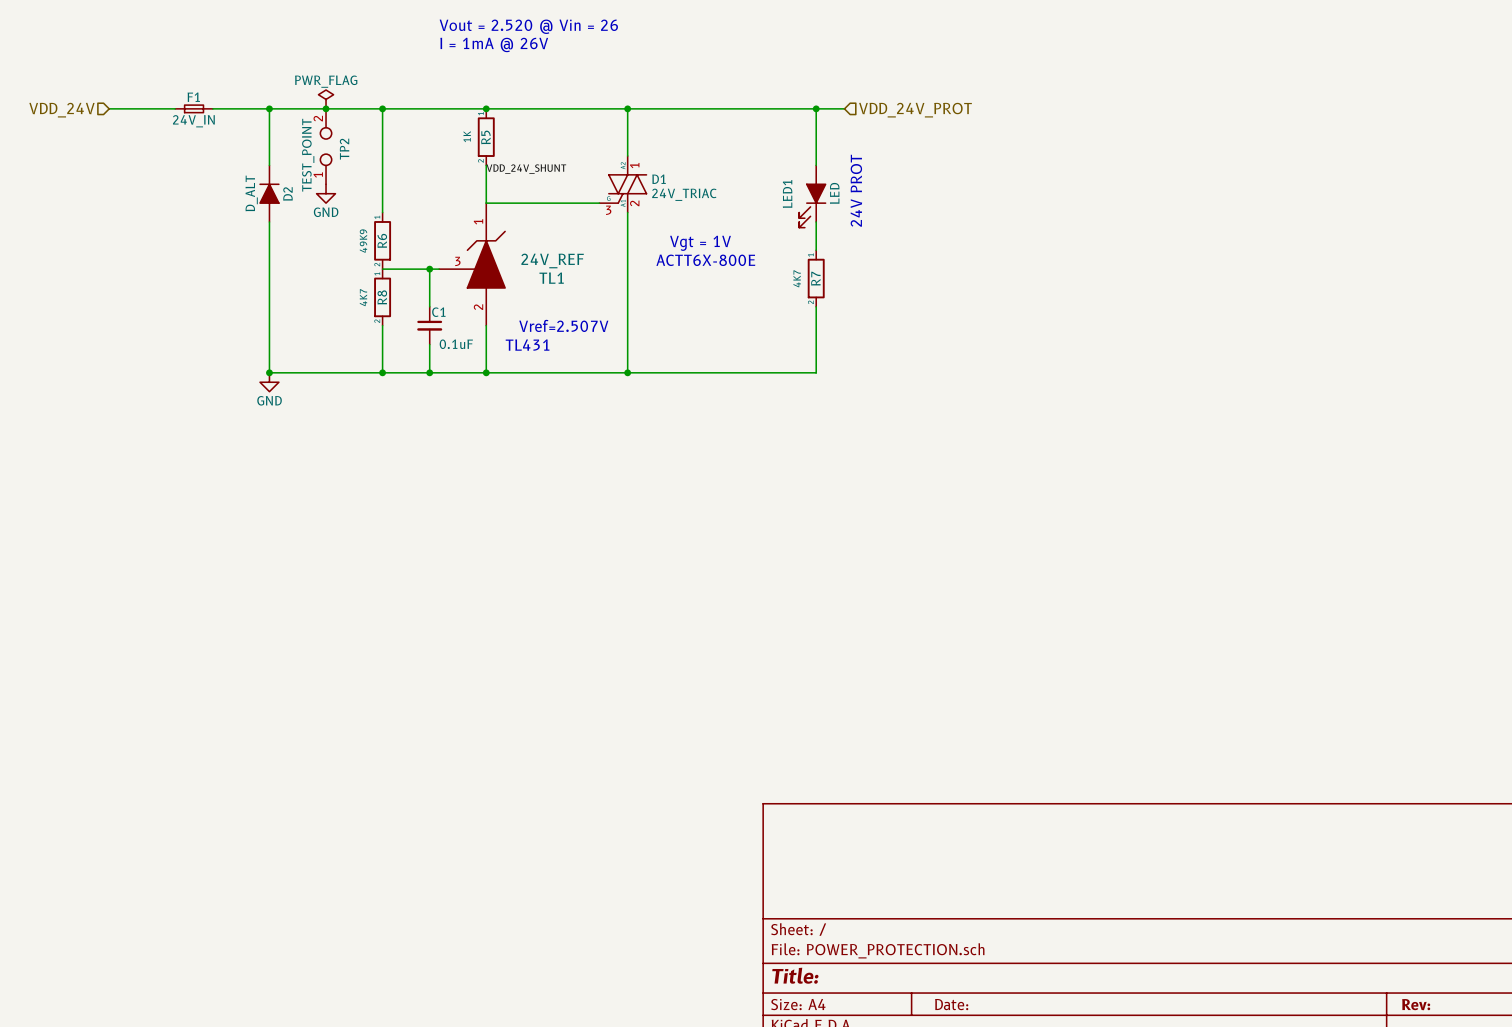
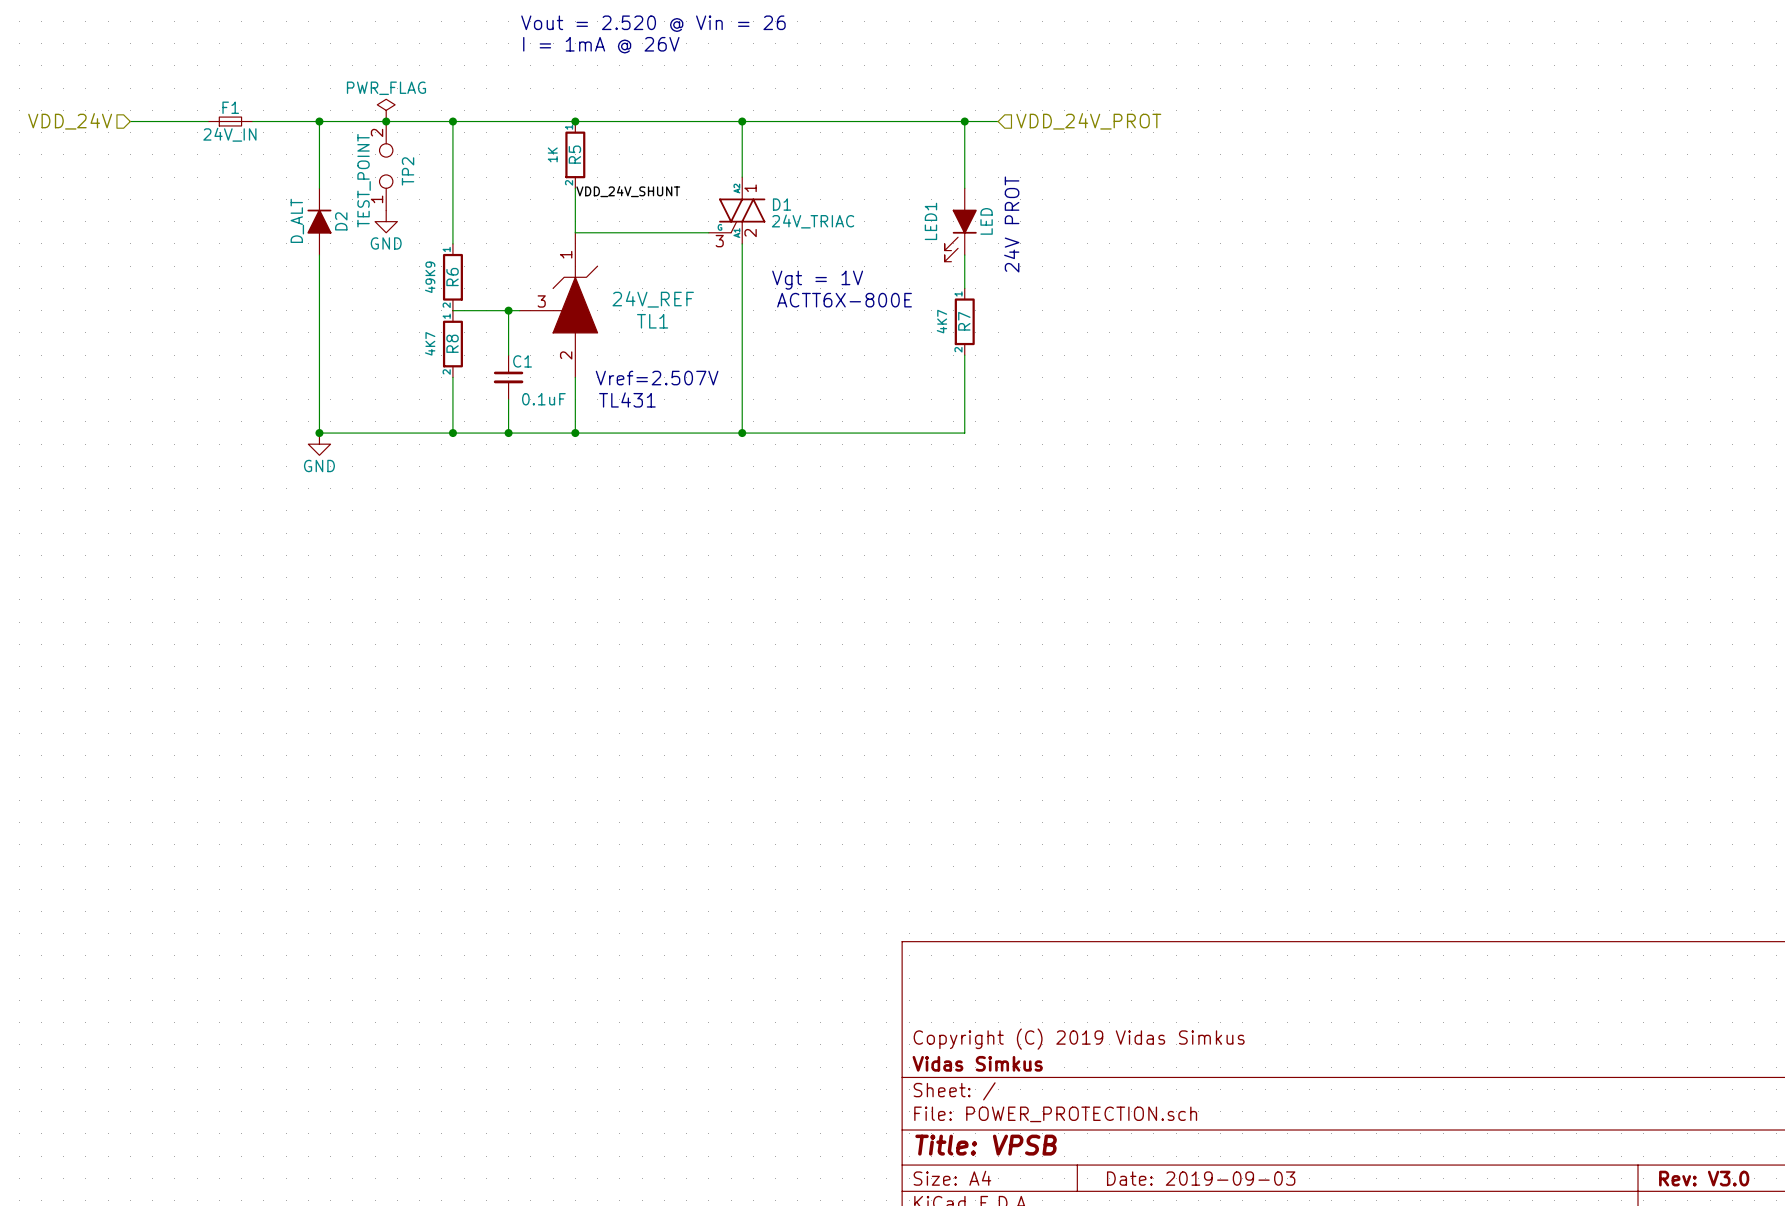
title block: none -> Copyright (C) 2019 Vidas Simkus (1079, 1039)
title block: none -> Vidas Simkus (977, 1063)
title block: Title: (795, 975) -> Title: VPSB (986, 1145)
title block: Date: (951, 1004) -> Date: 2019-09-03 (1201, 1178)
title block: Rev: (1416, 1004) -> Rev: V3.0 (1704, 1178)

